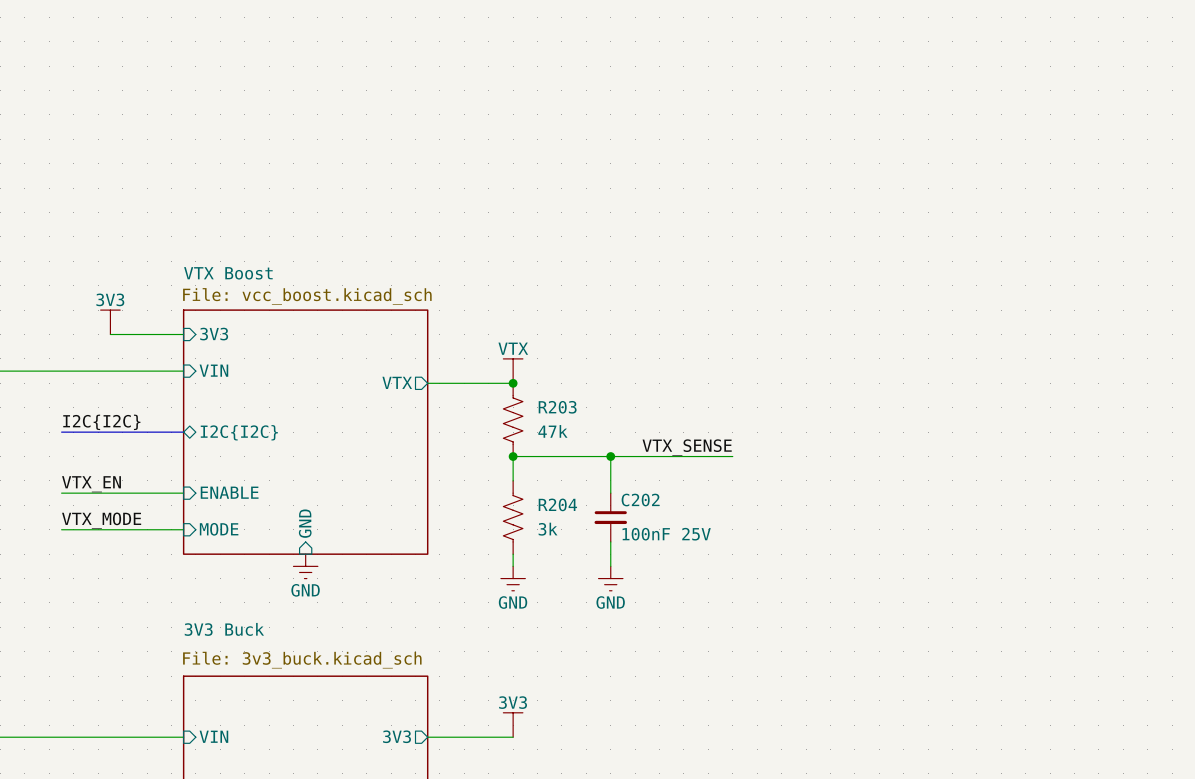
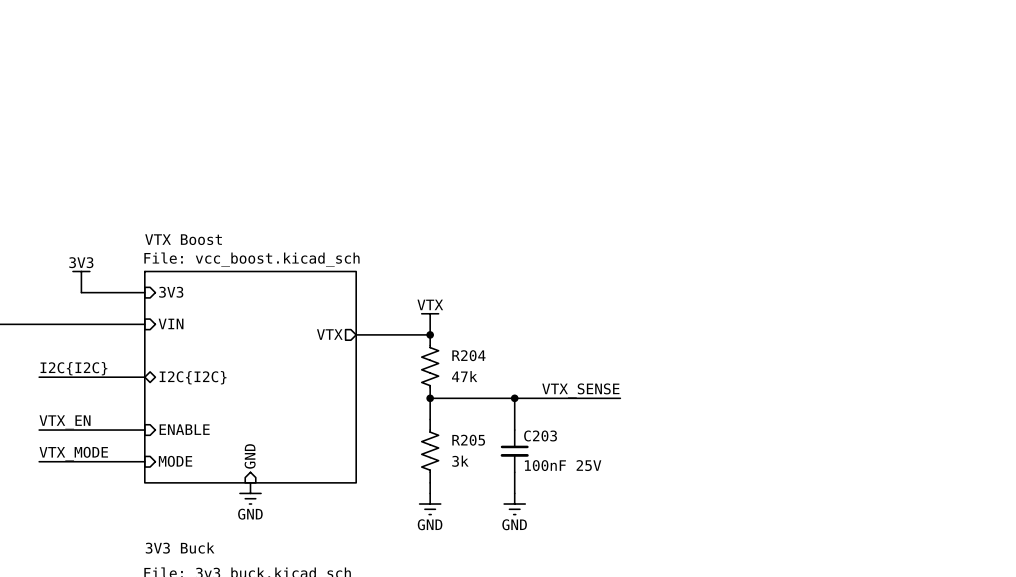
R203 name: R203 (557, 407) -> R204 (468, 355)
C202 name: C202 (640, 500) -> C203 (540, 435)
R204 name: R204 (557, 504) -> R205 (468, 440)

